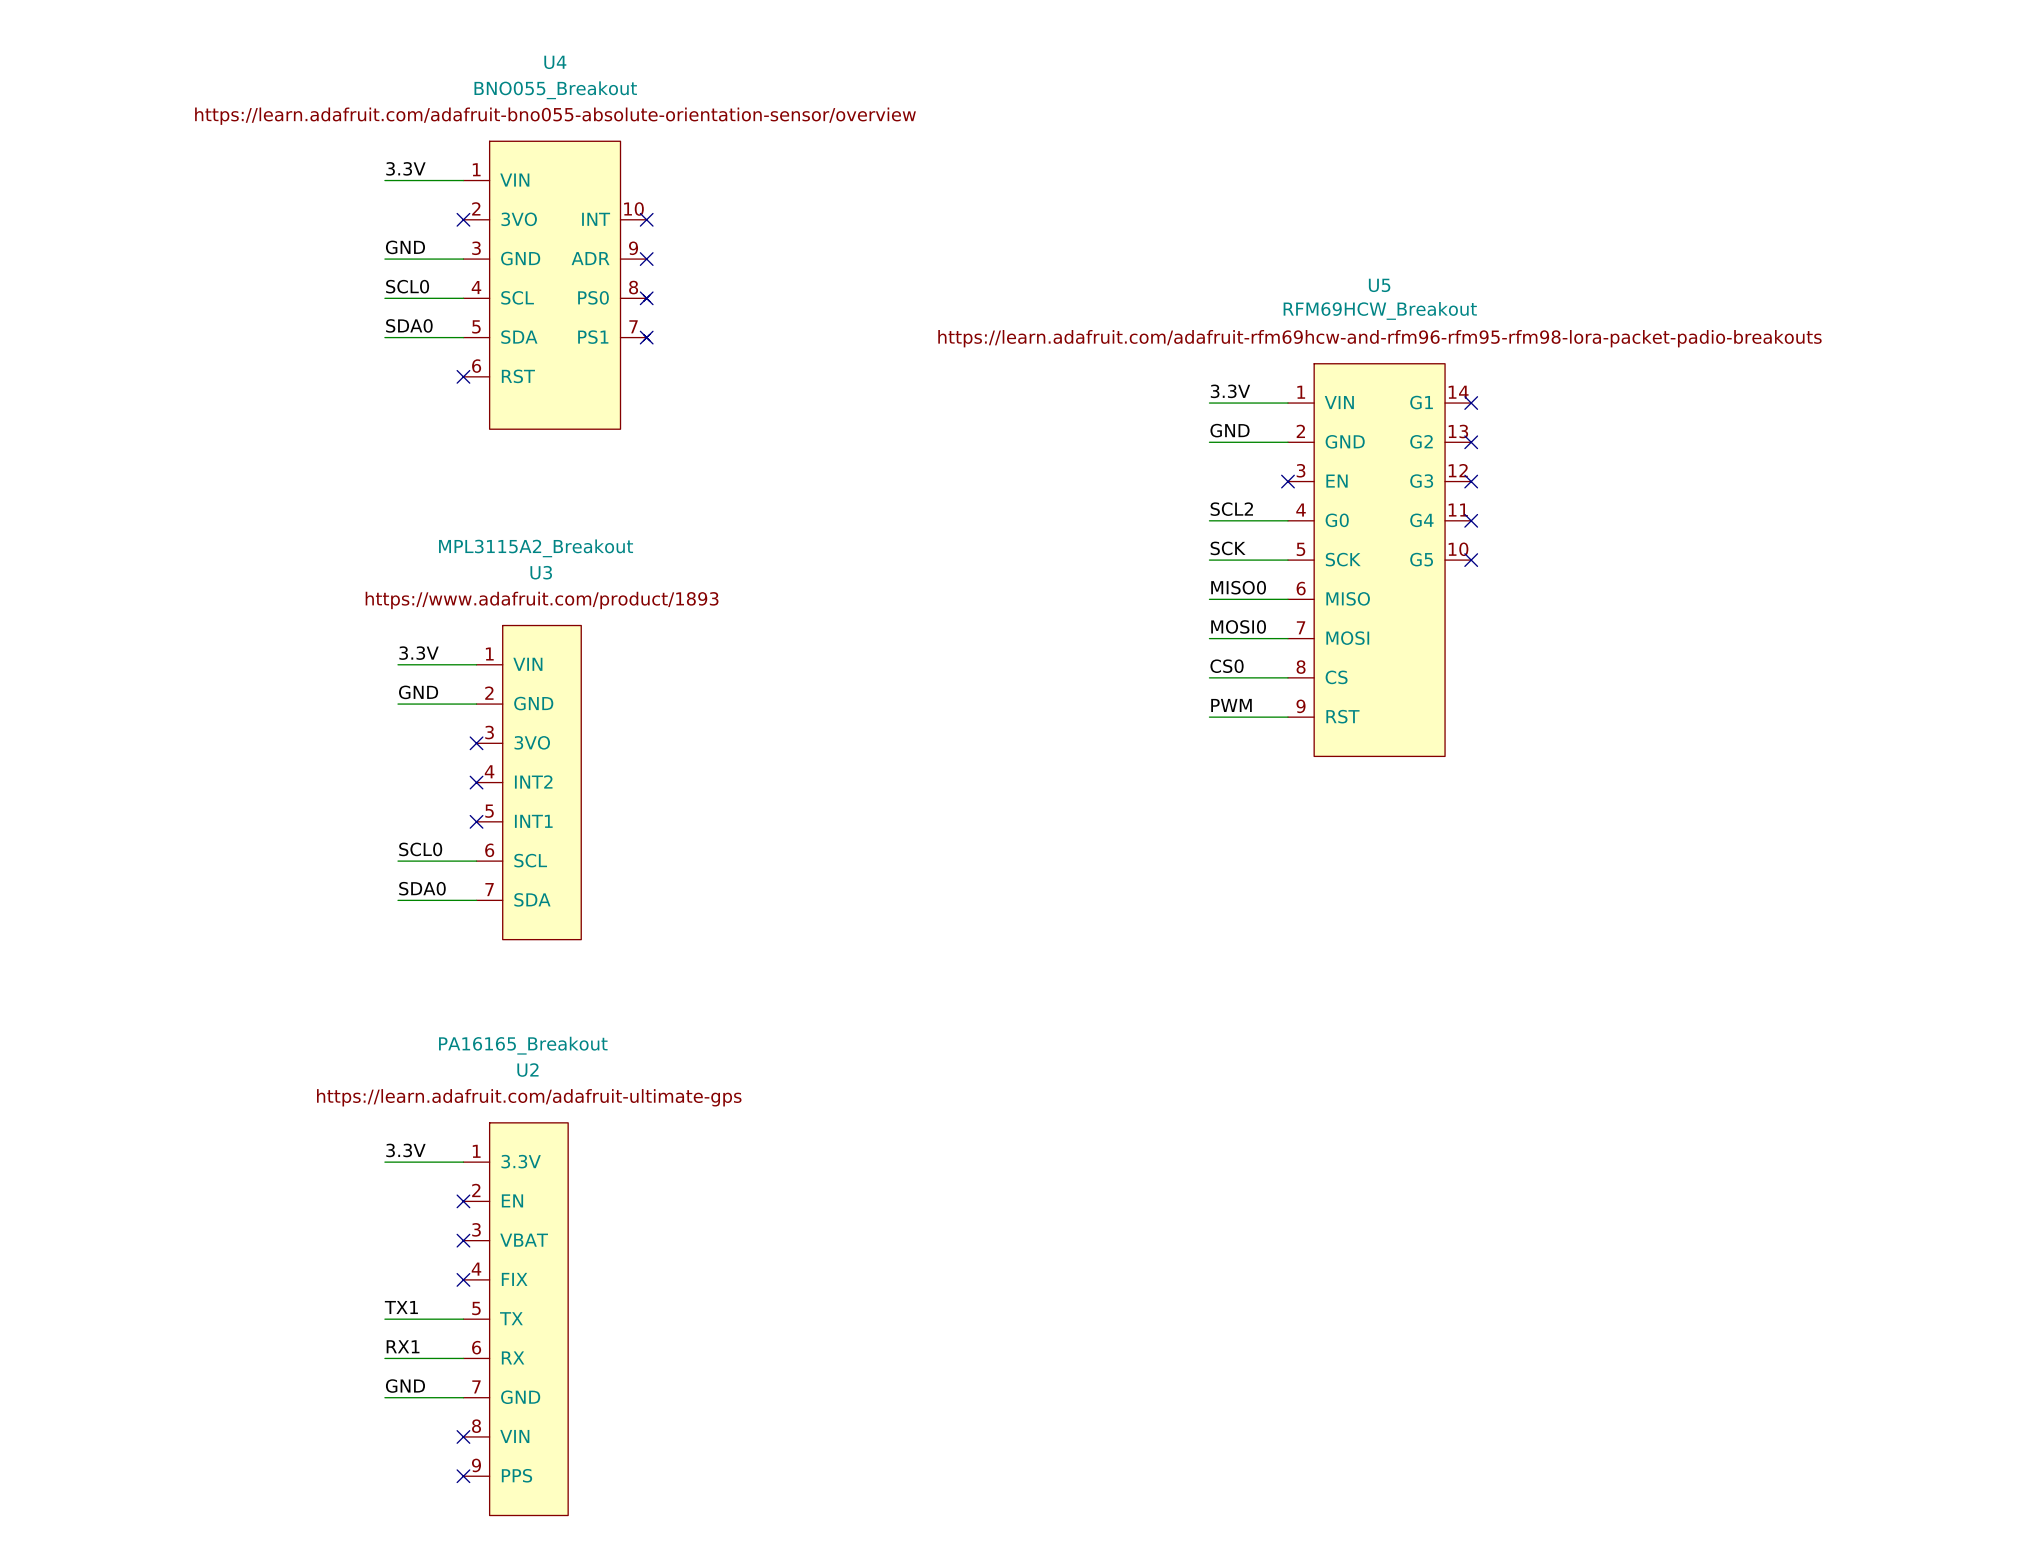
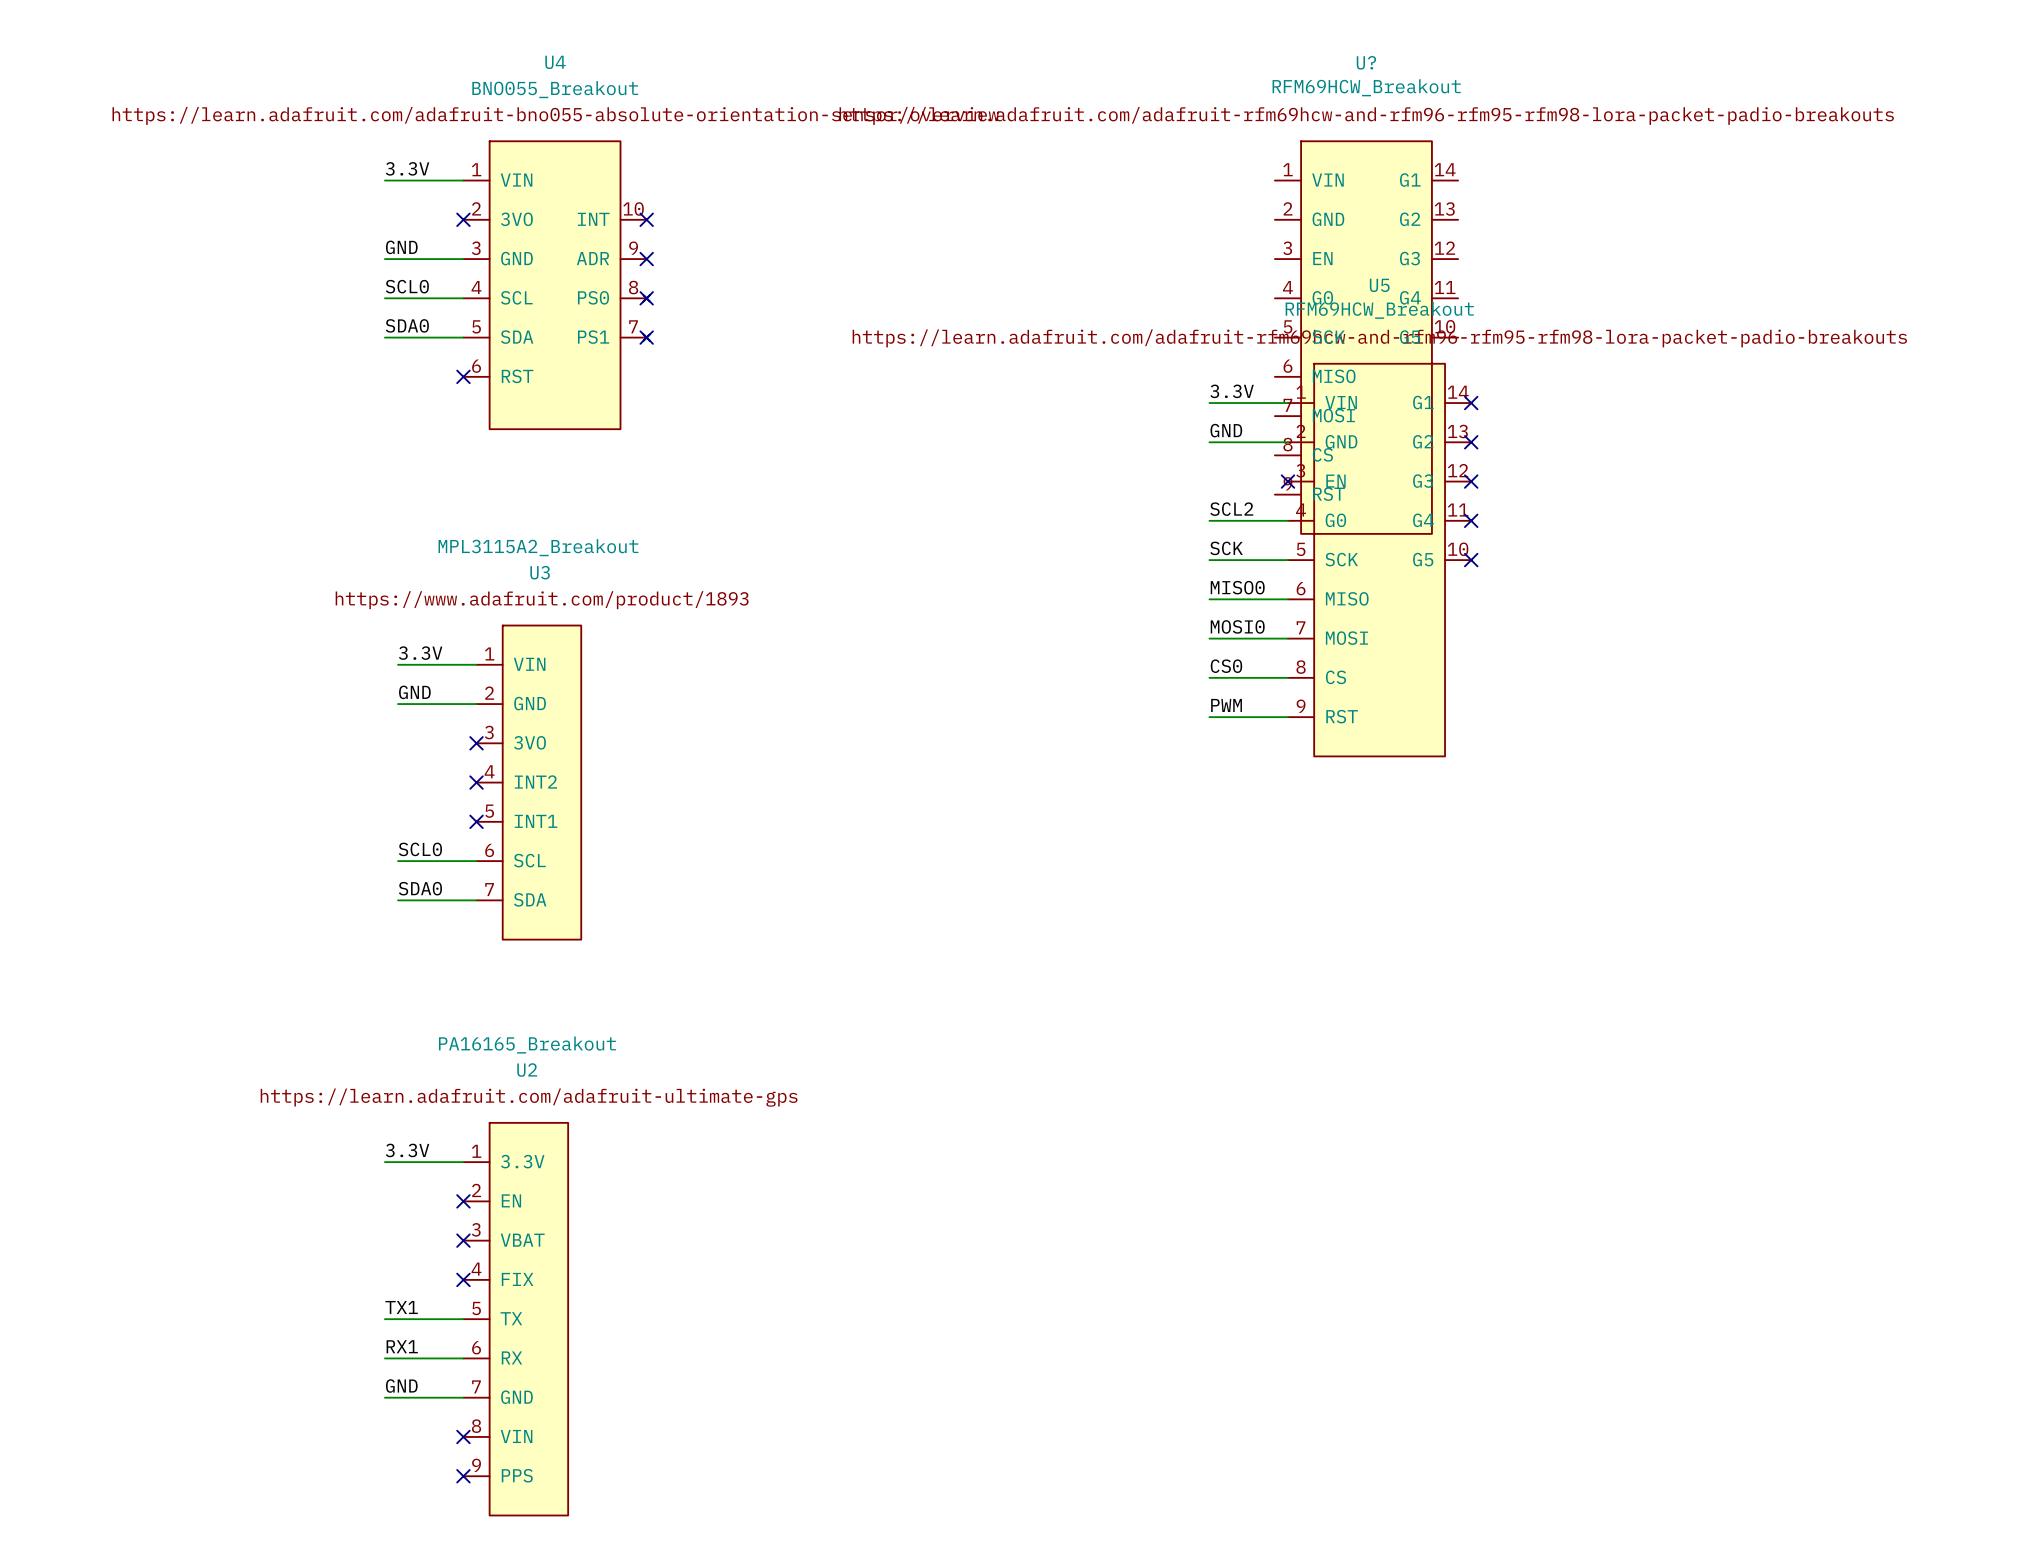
U?: none -> RFM69HCW_Breakout (1366, 337)

